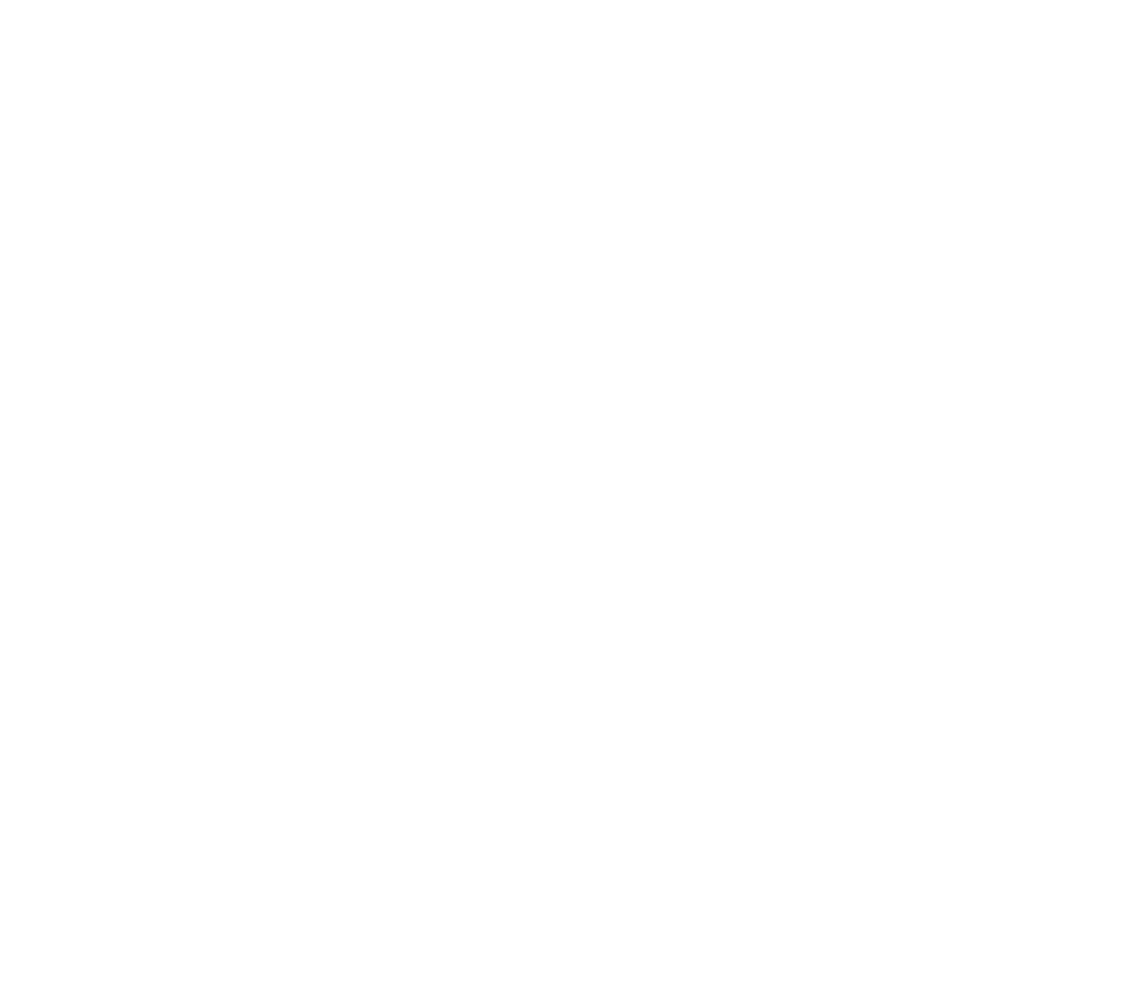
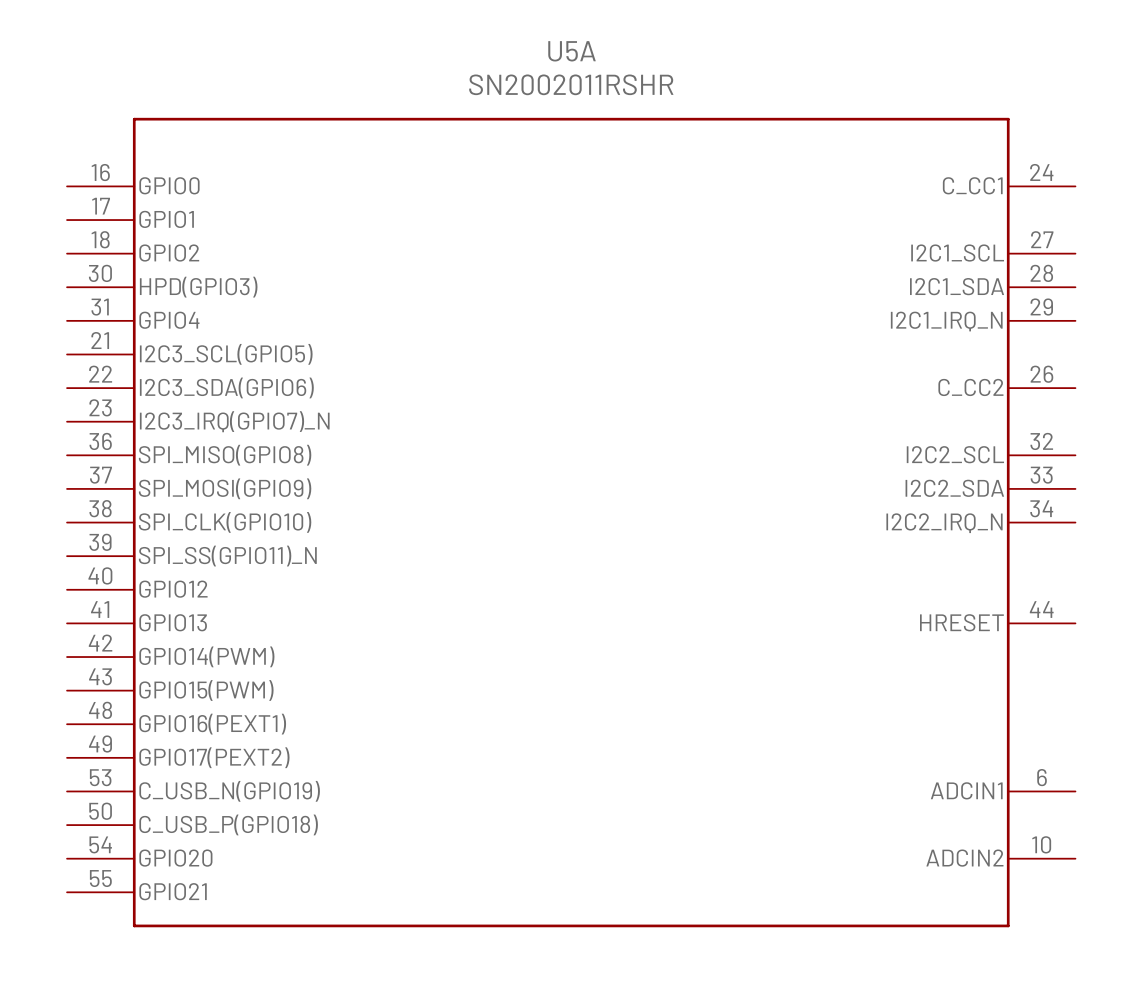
U5A: none -> SN2002011RSHR (571, 522)

